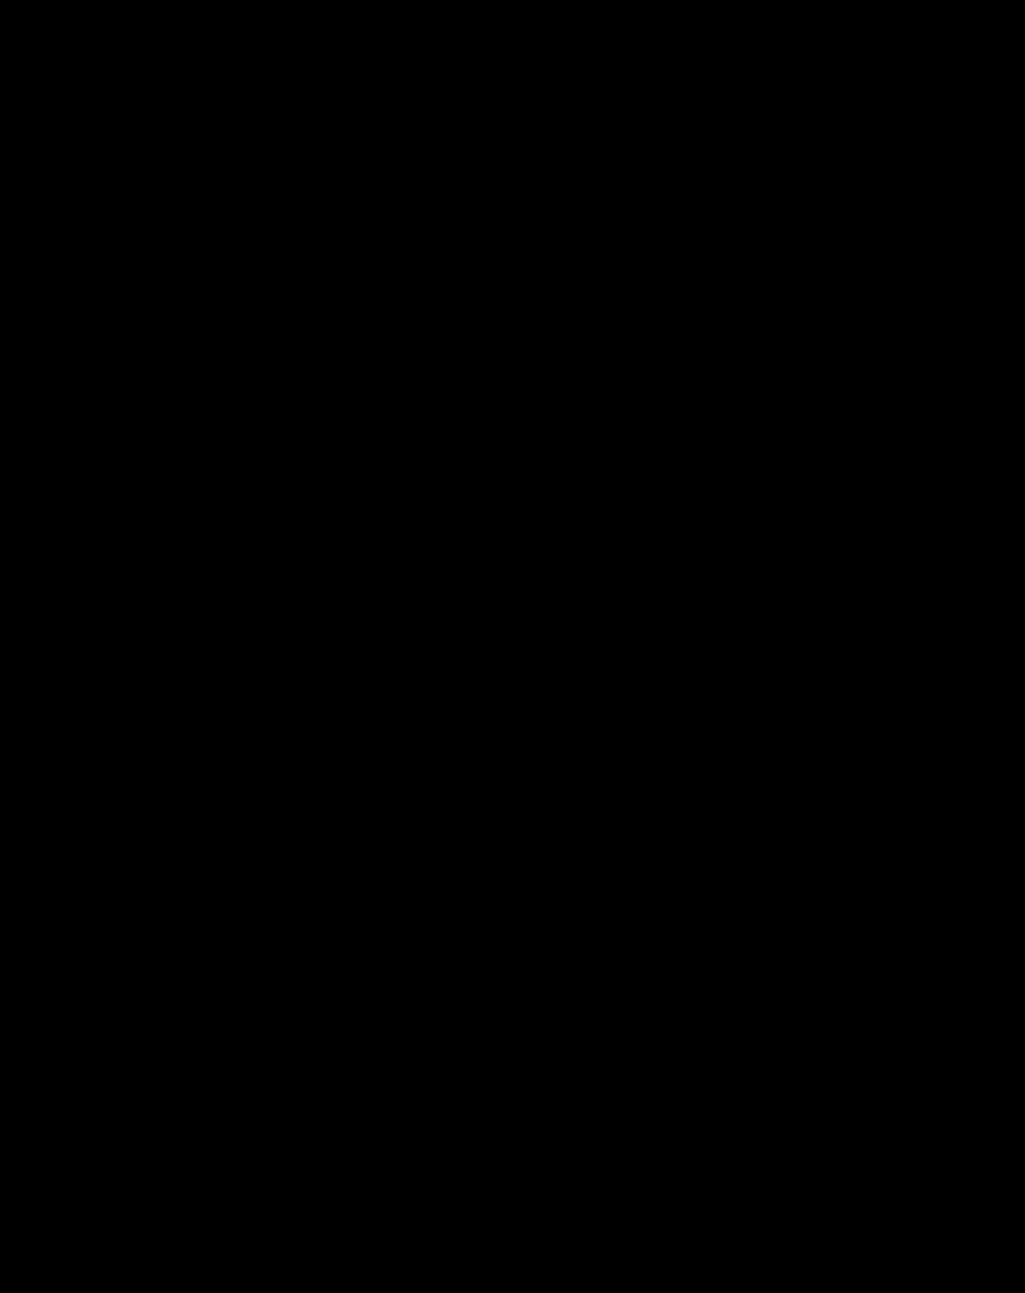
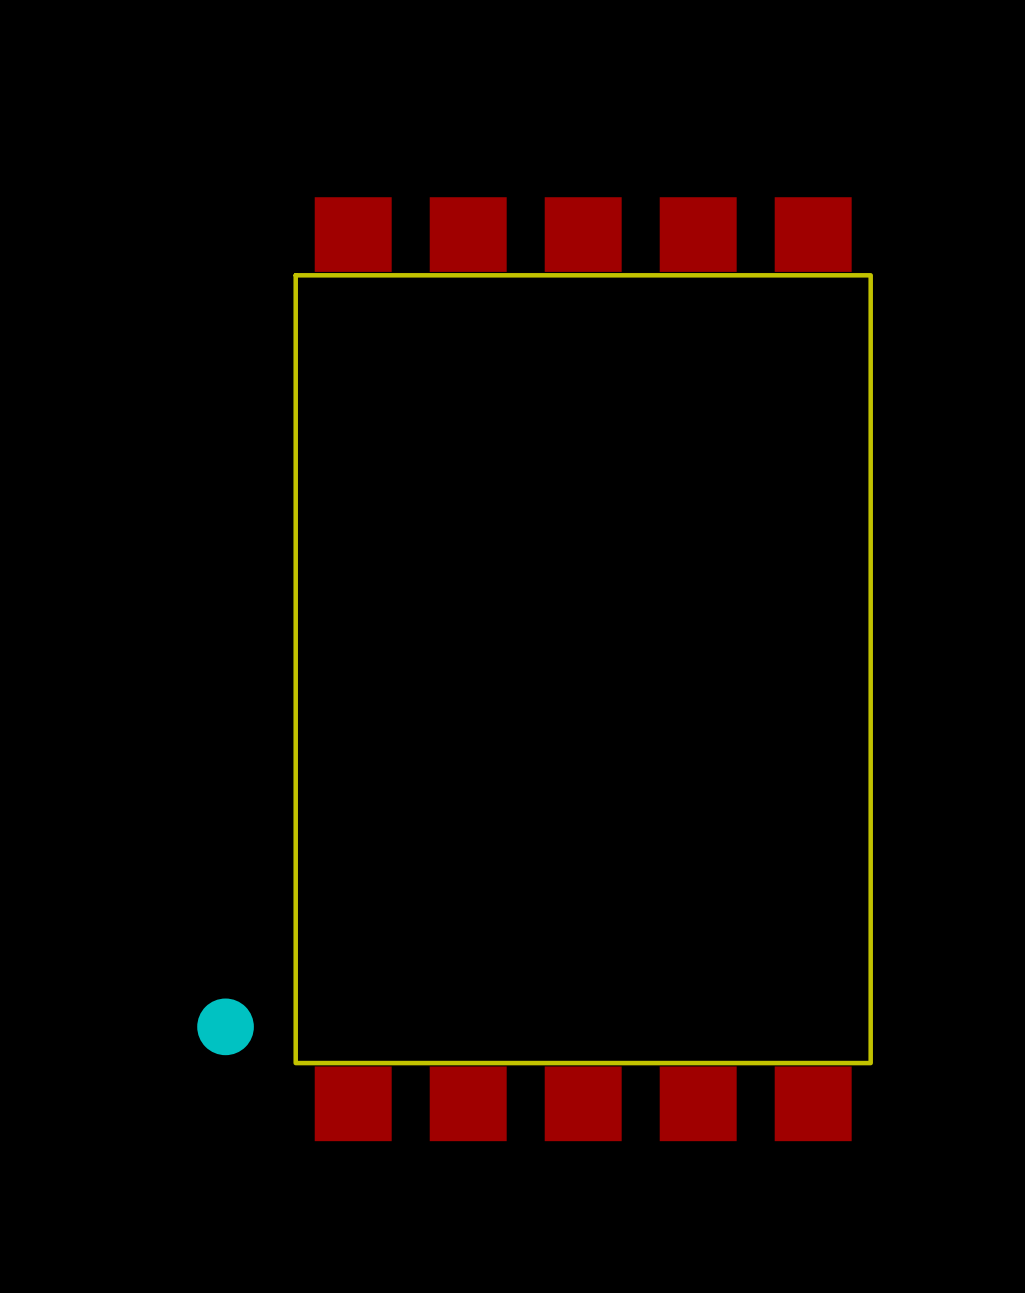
part: none -> (535, 669)

